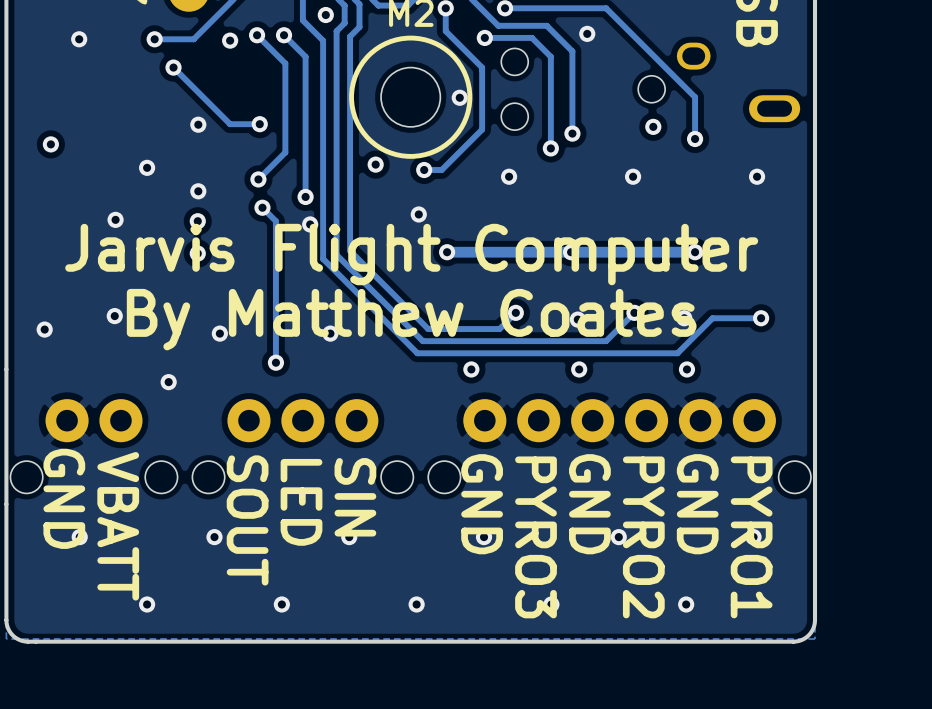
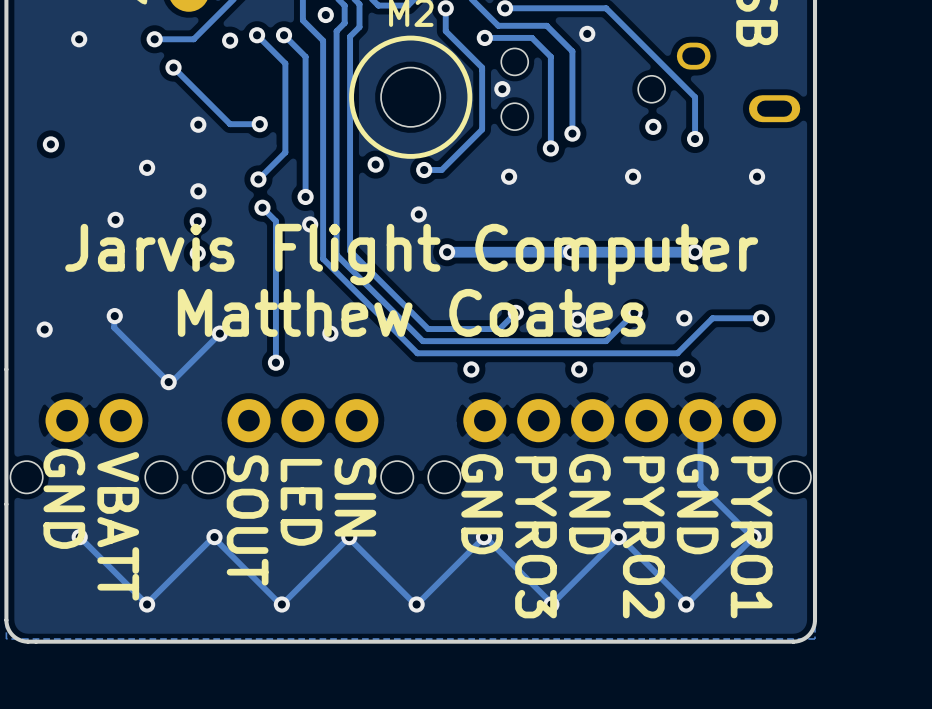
via position: (459, 97) -> (502, 89)
track: none -> (114, 315) (114, 327) (169, 382) (220, 333)
text: By Matthew Coates (411, 319) -> Matthew Coates (411, 312)
track: none -> (700, 420) (700, 485) (753, 537) (686, 603) (619, 536) (552, 603) (484, 536) (416, 605) (348, 537)
track: none -> (348, 537) (281, 605) (213, 536) (146, 603) (79, 537)

